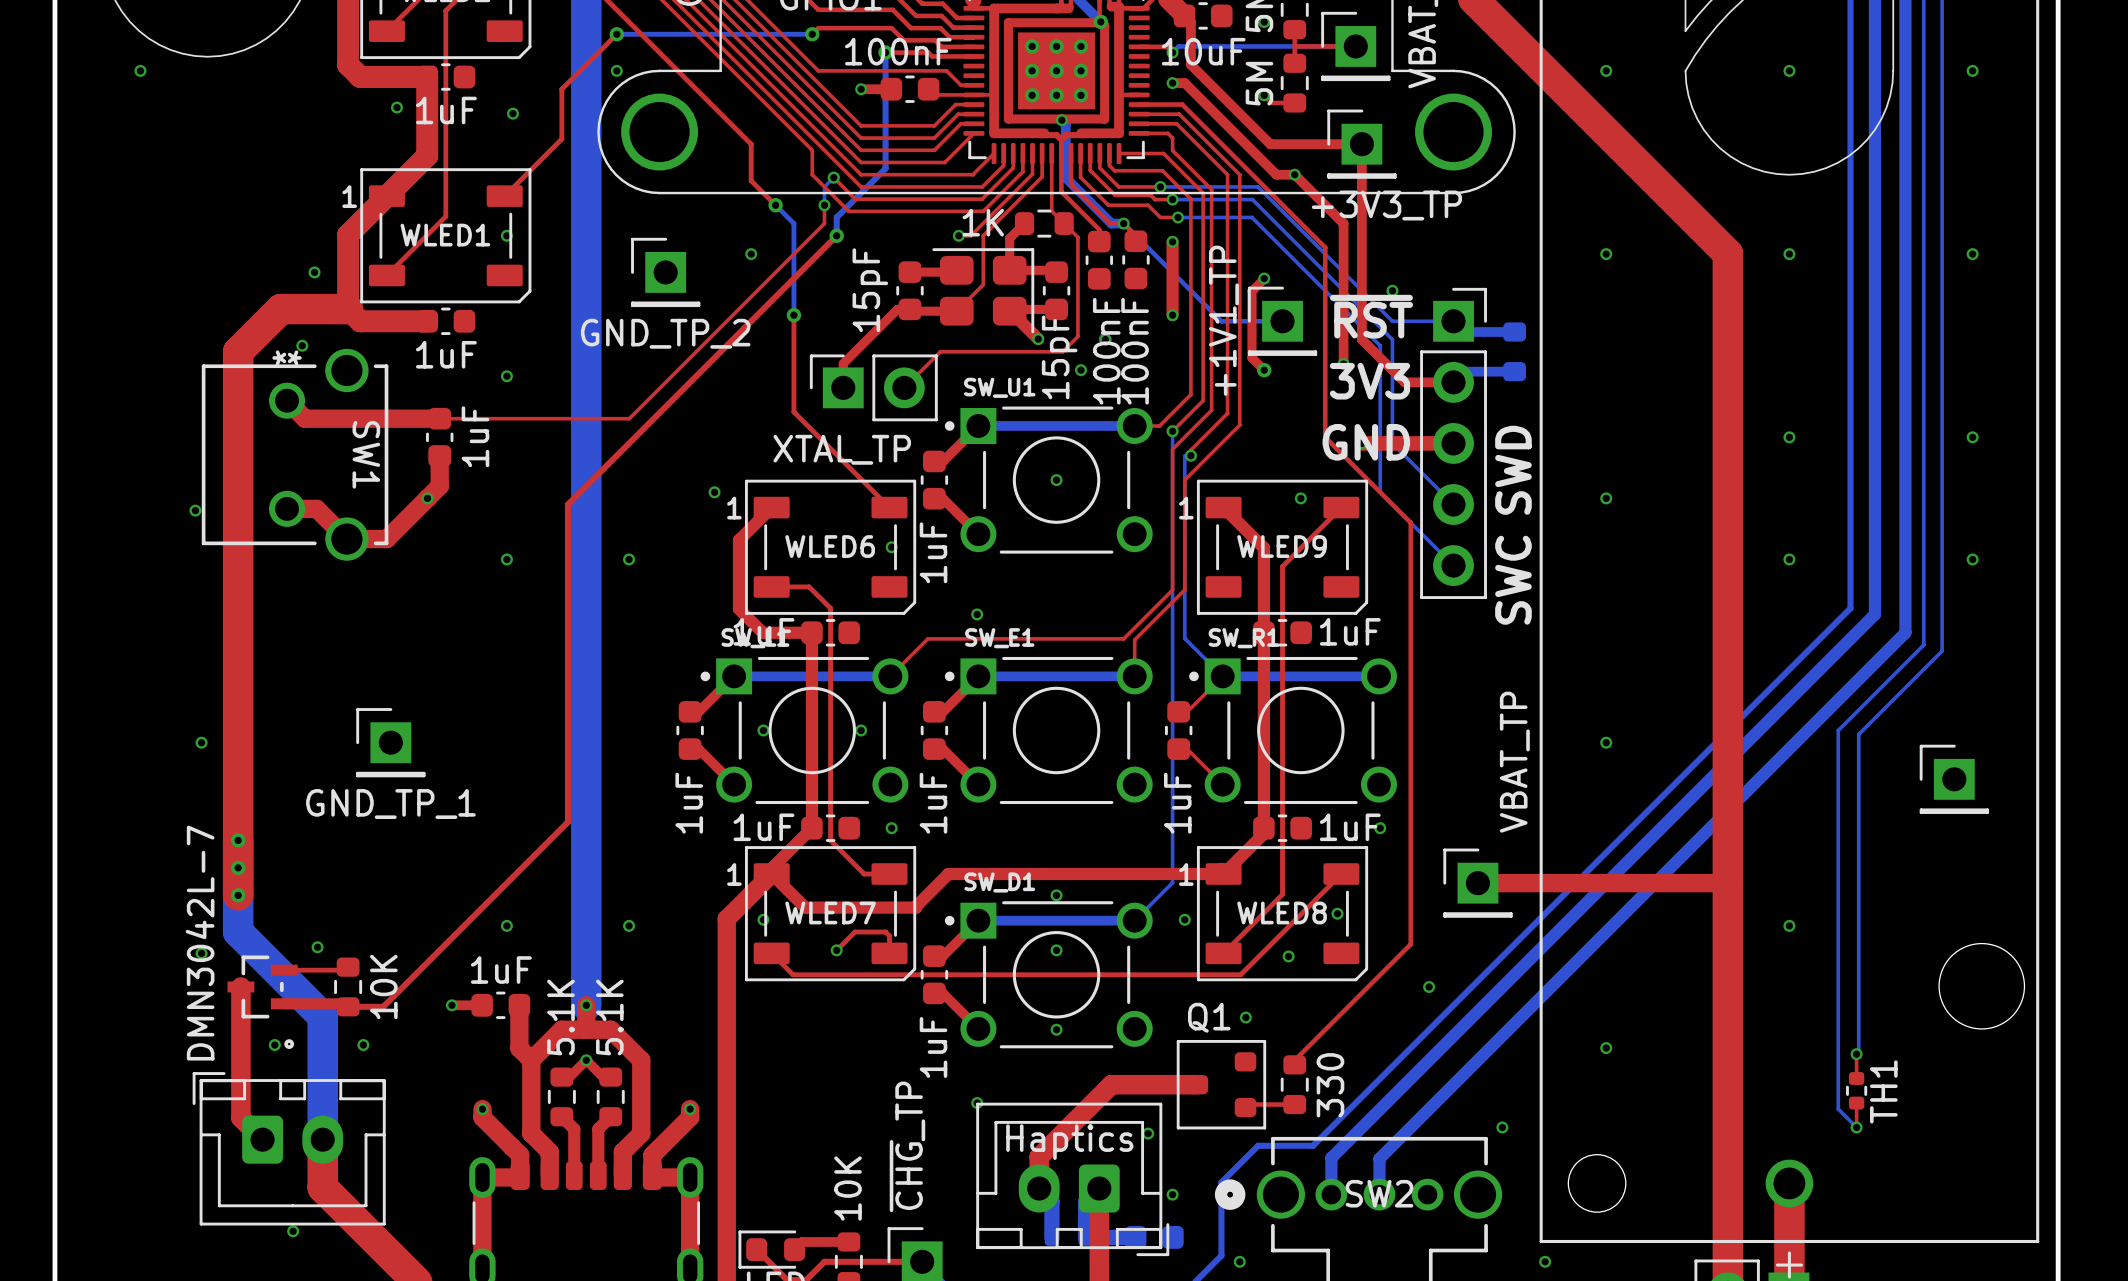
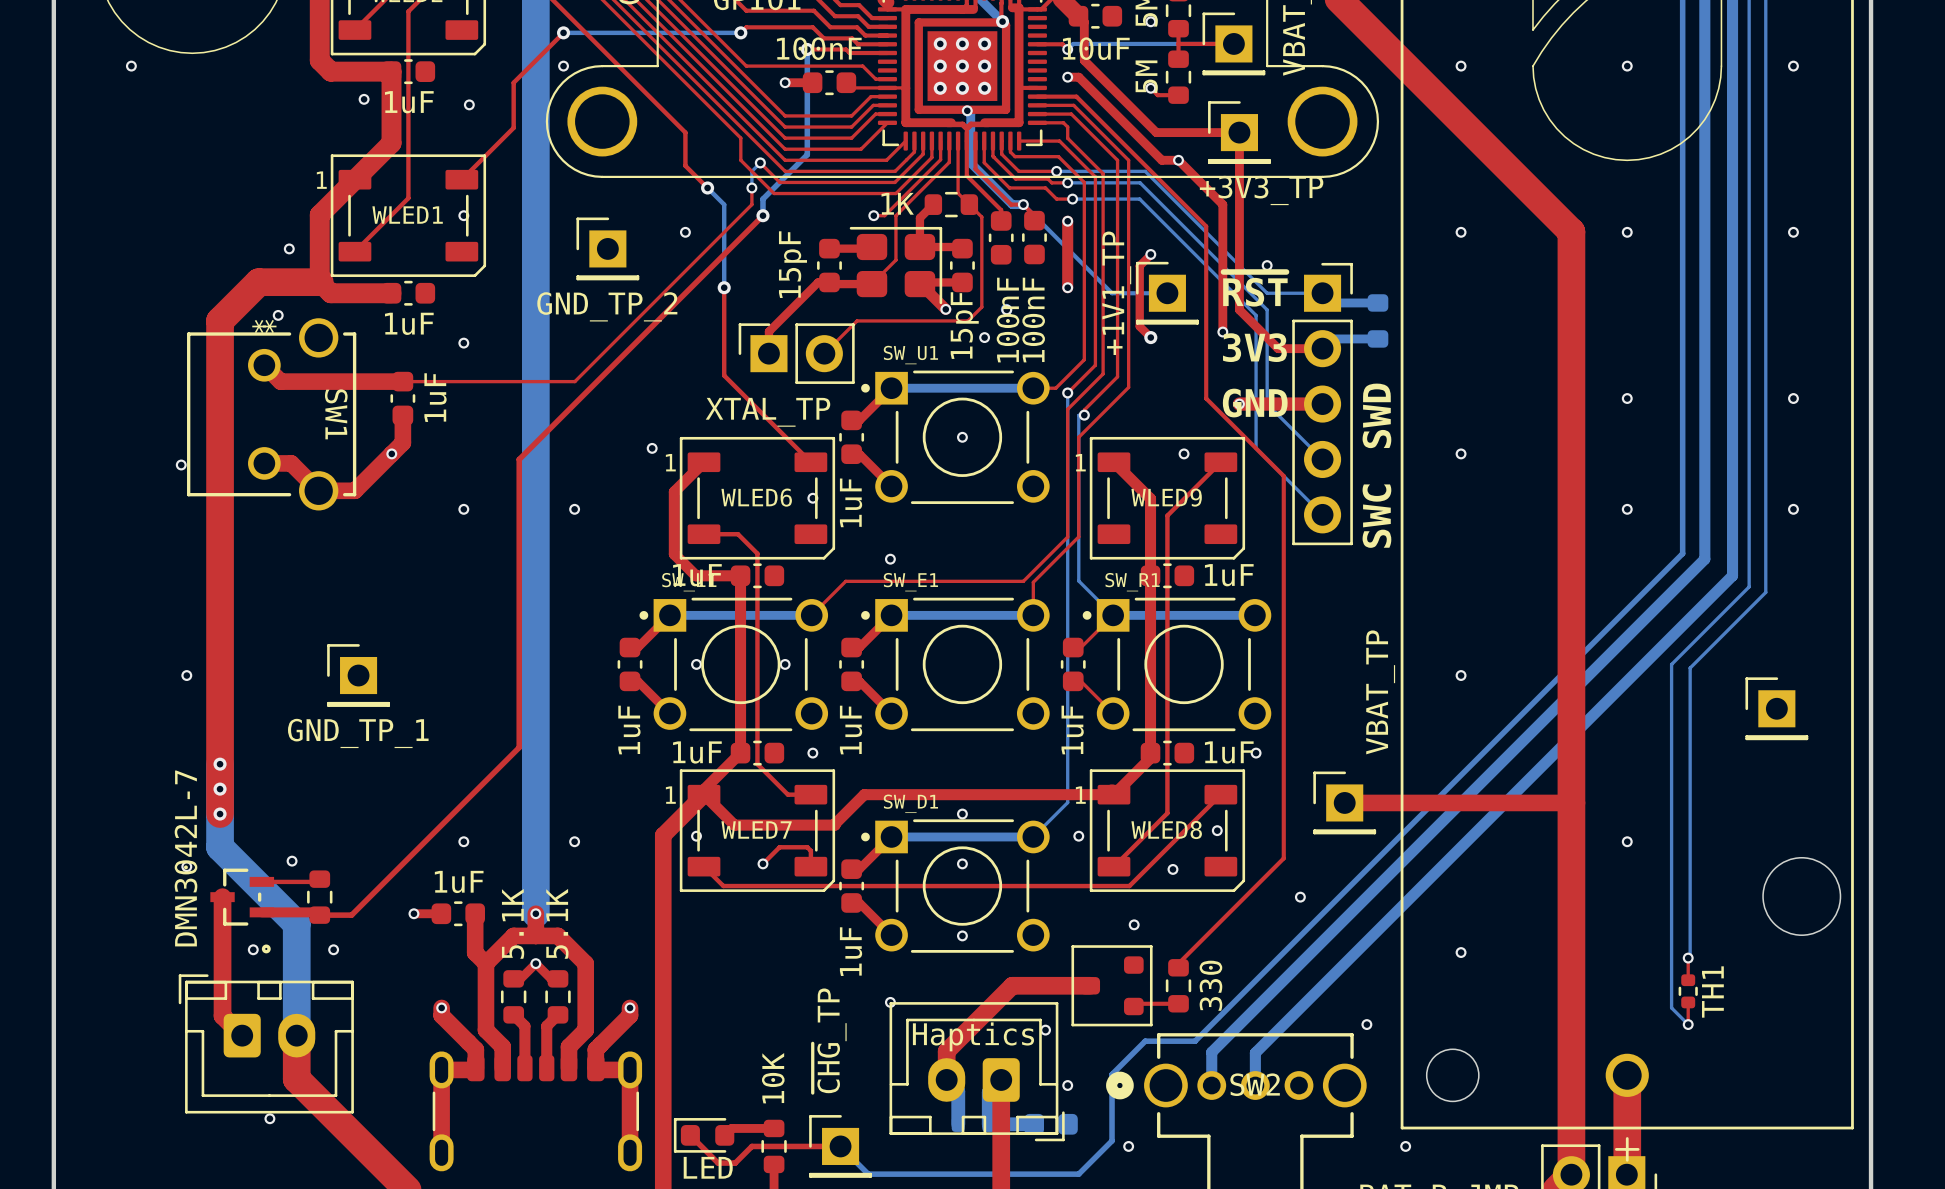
part value: 10K (383, 986) -> none
Q1 name: Q1 (1209, 1017) -> none

